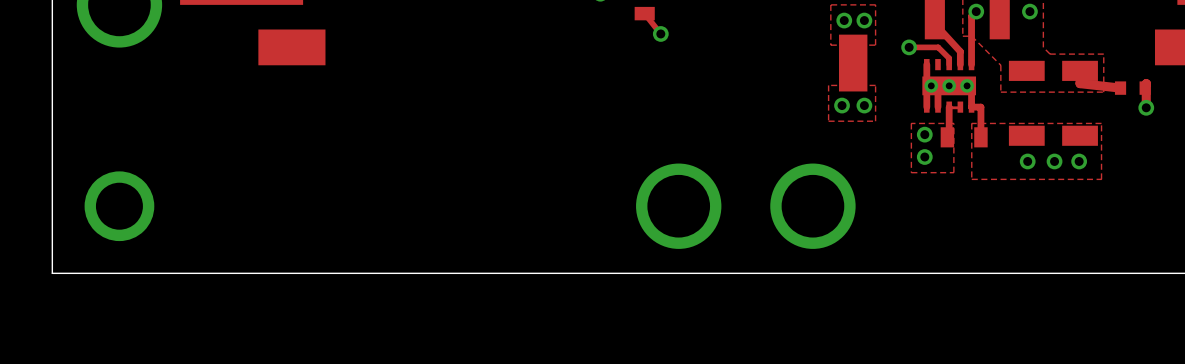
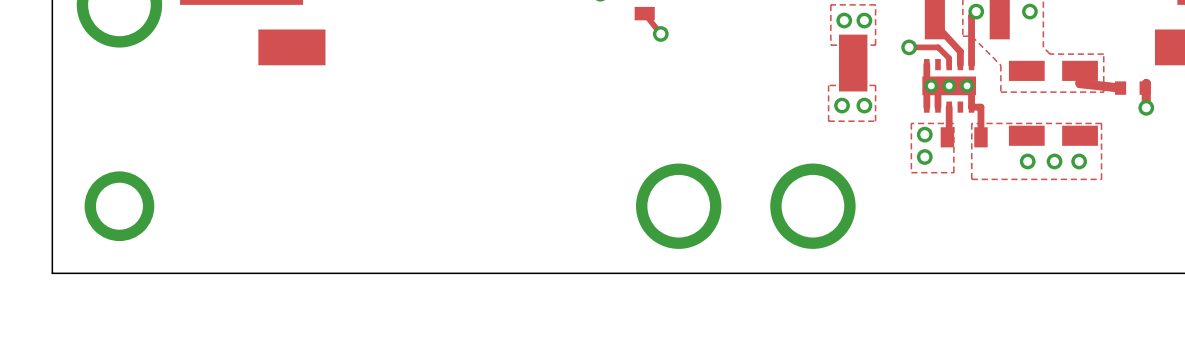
top track: (960, 107) (949, 107) -> none

